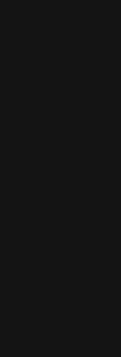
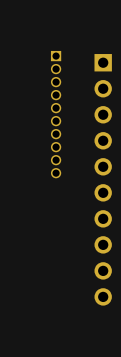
part: none -> (56, 114)
part: none -> (103, 179)

